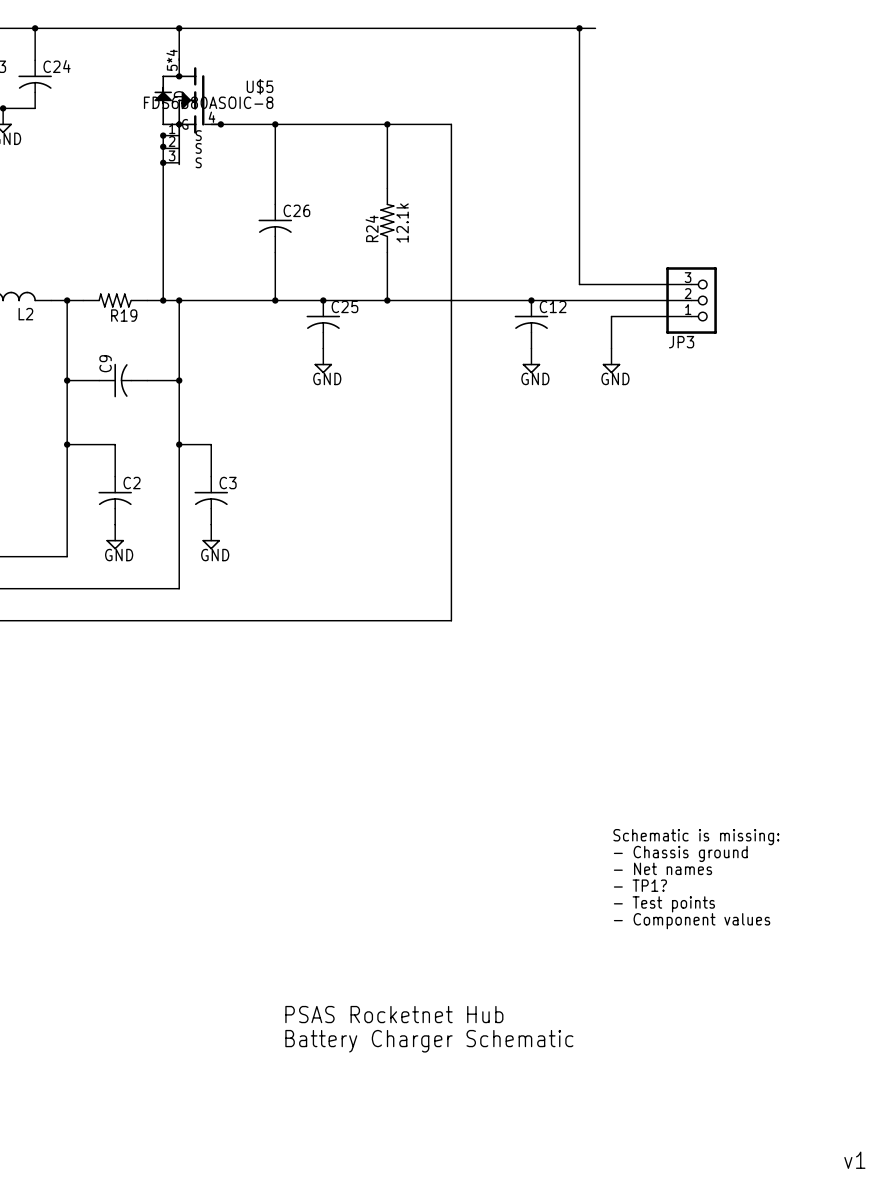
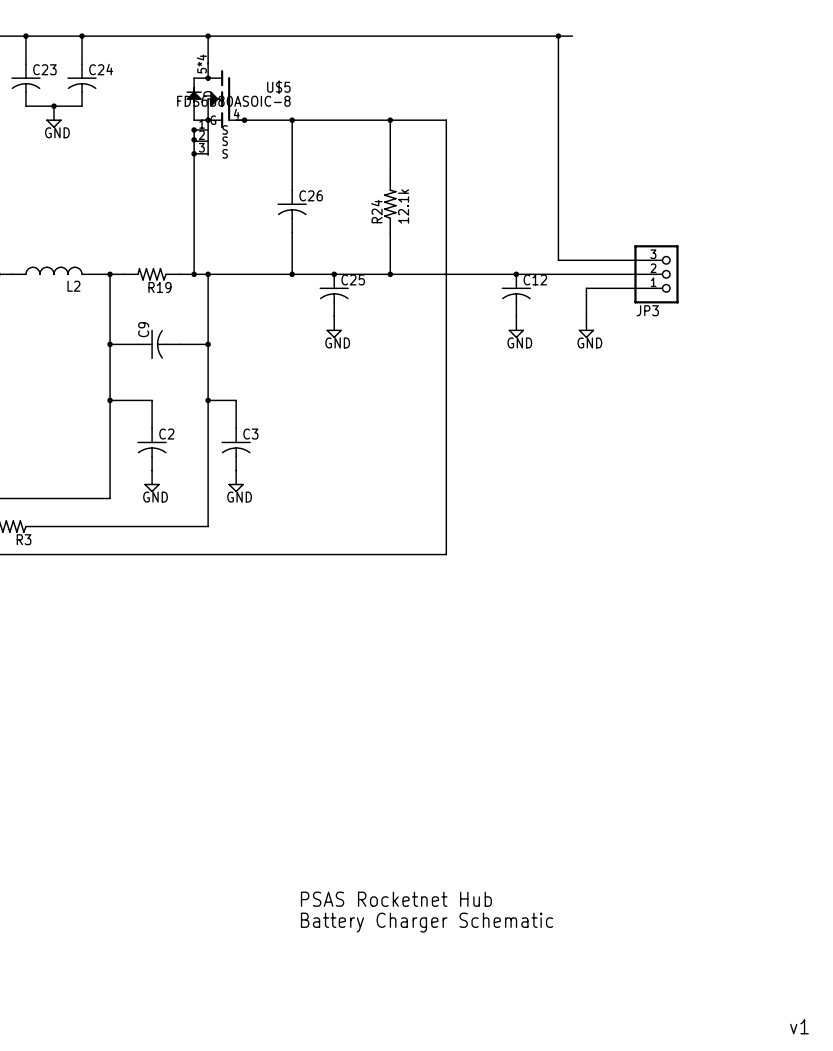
text: Schematic is missing: (696, 837) -> none
text: - Chassis ground (680, 853) -> none
text: - Net names (663, 868) -> none
text: - TP1? (640, 885) -> none
text: - Test points (664, 904) -> none
text: - Component values (692, 921) -> none

